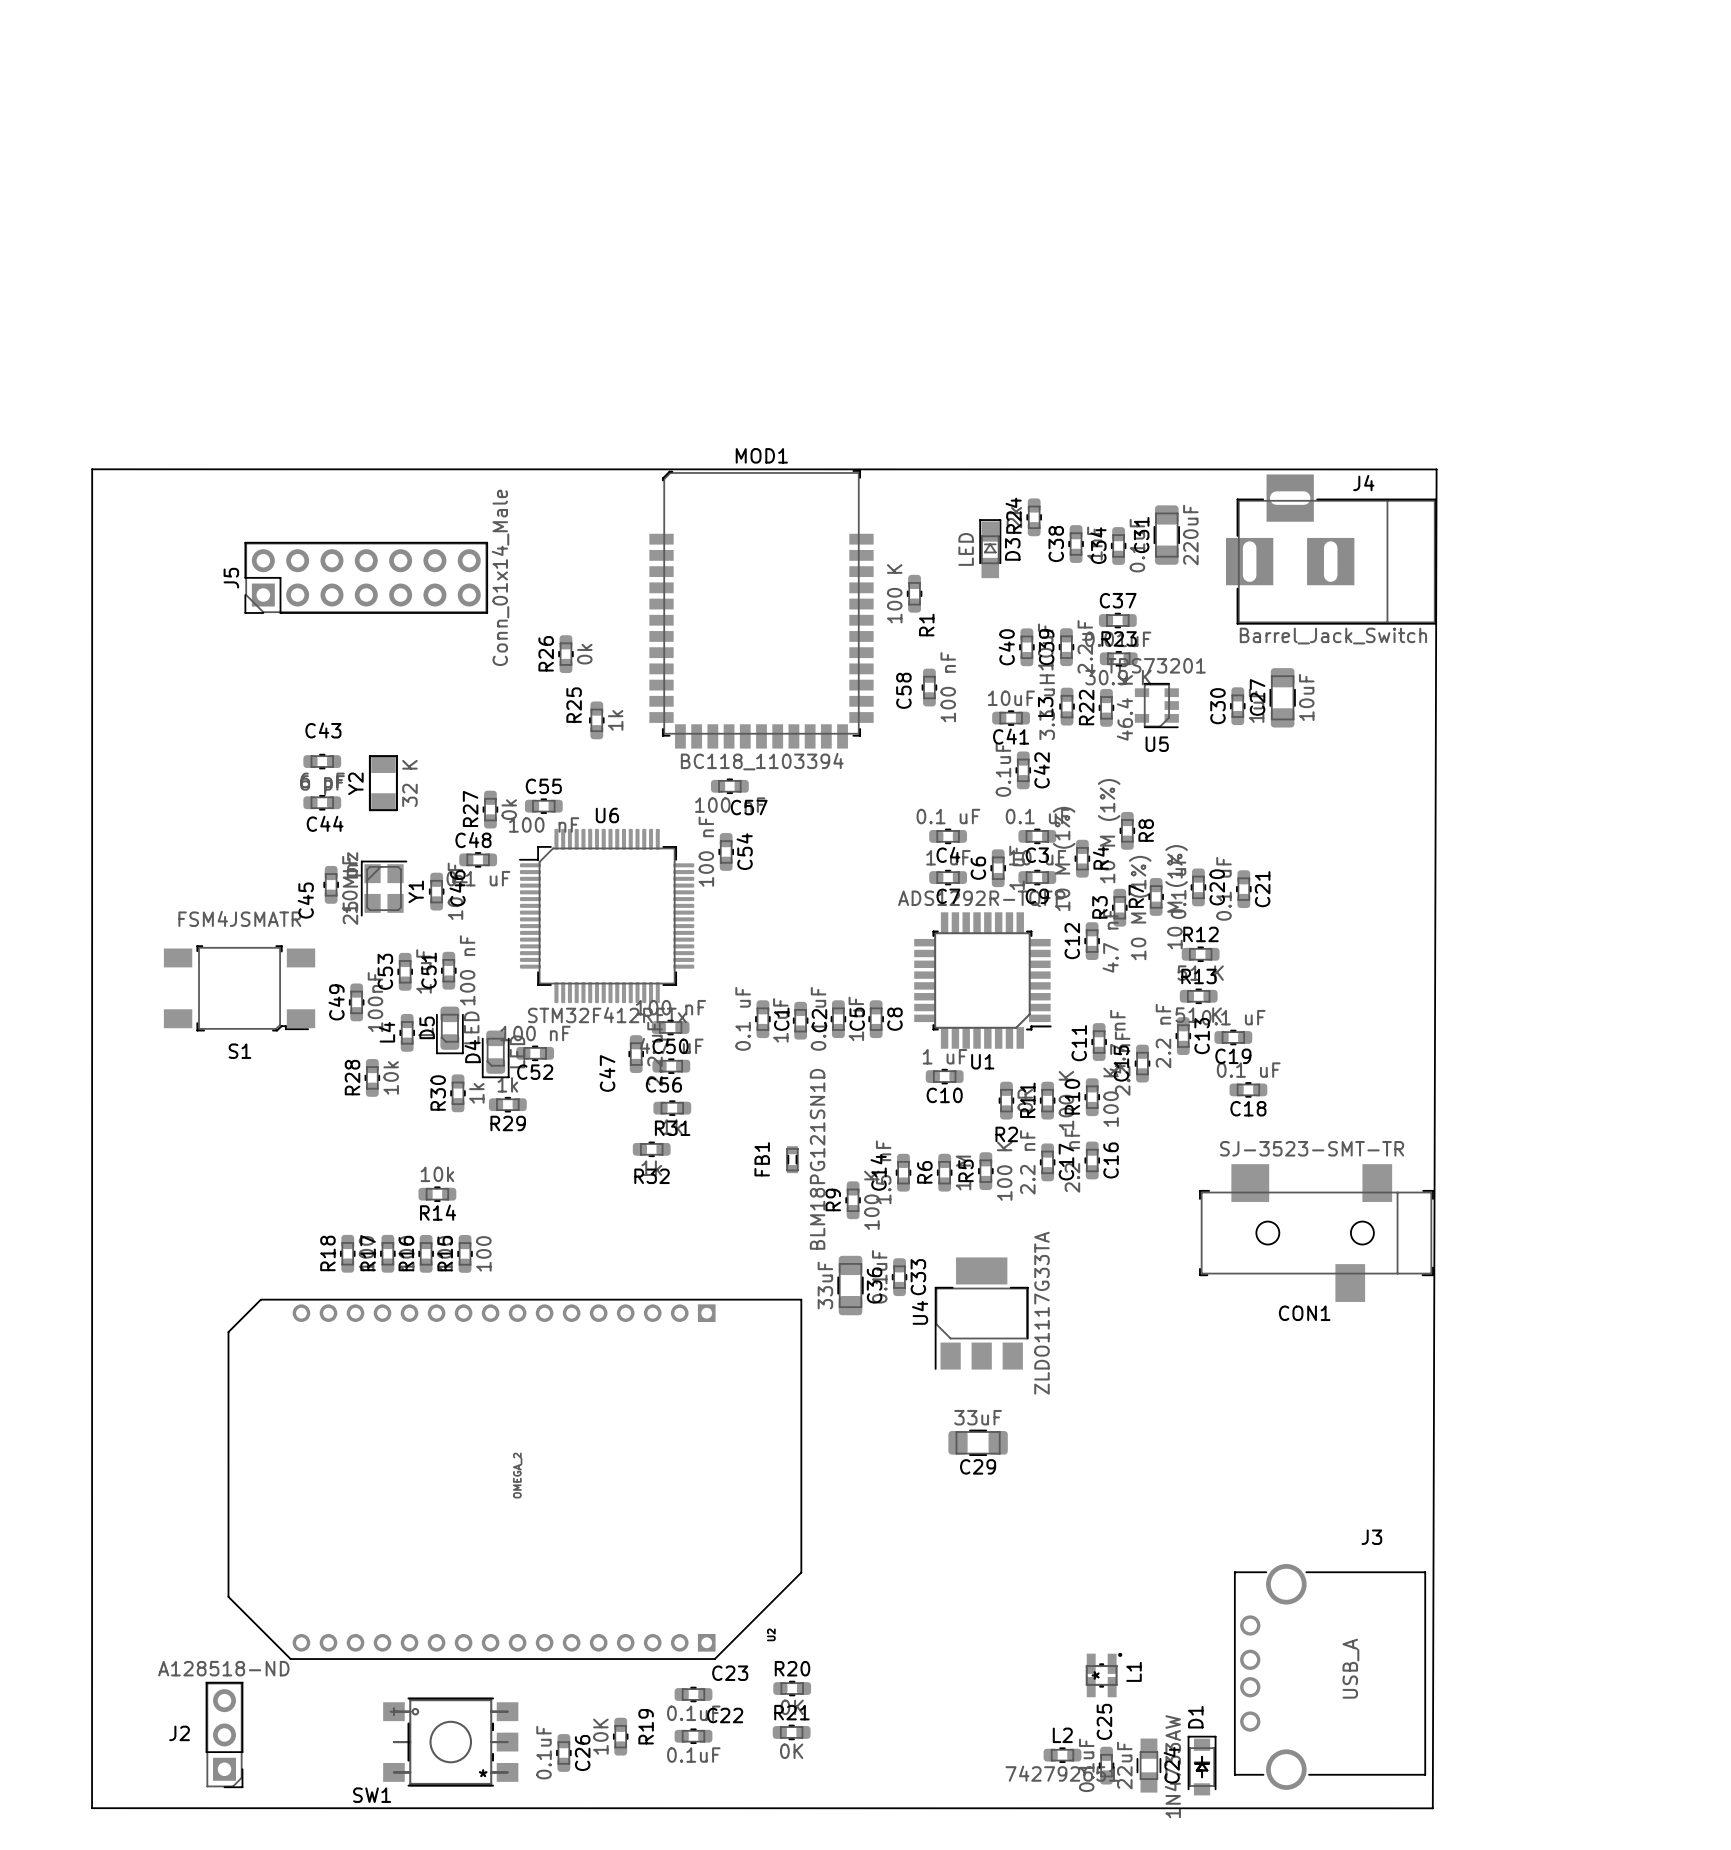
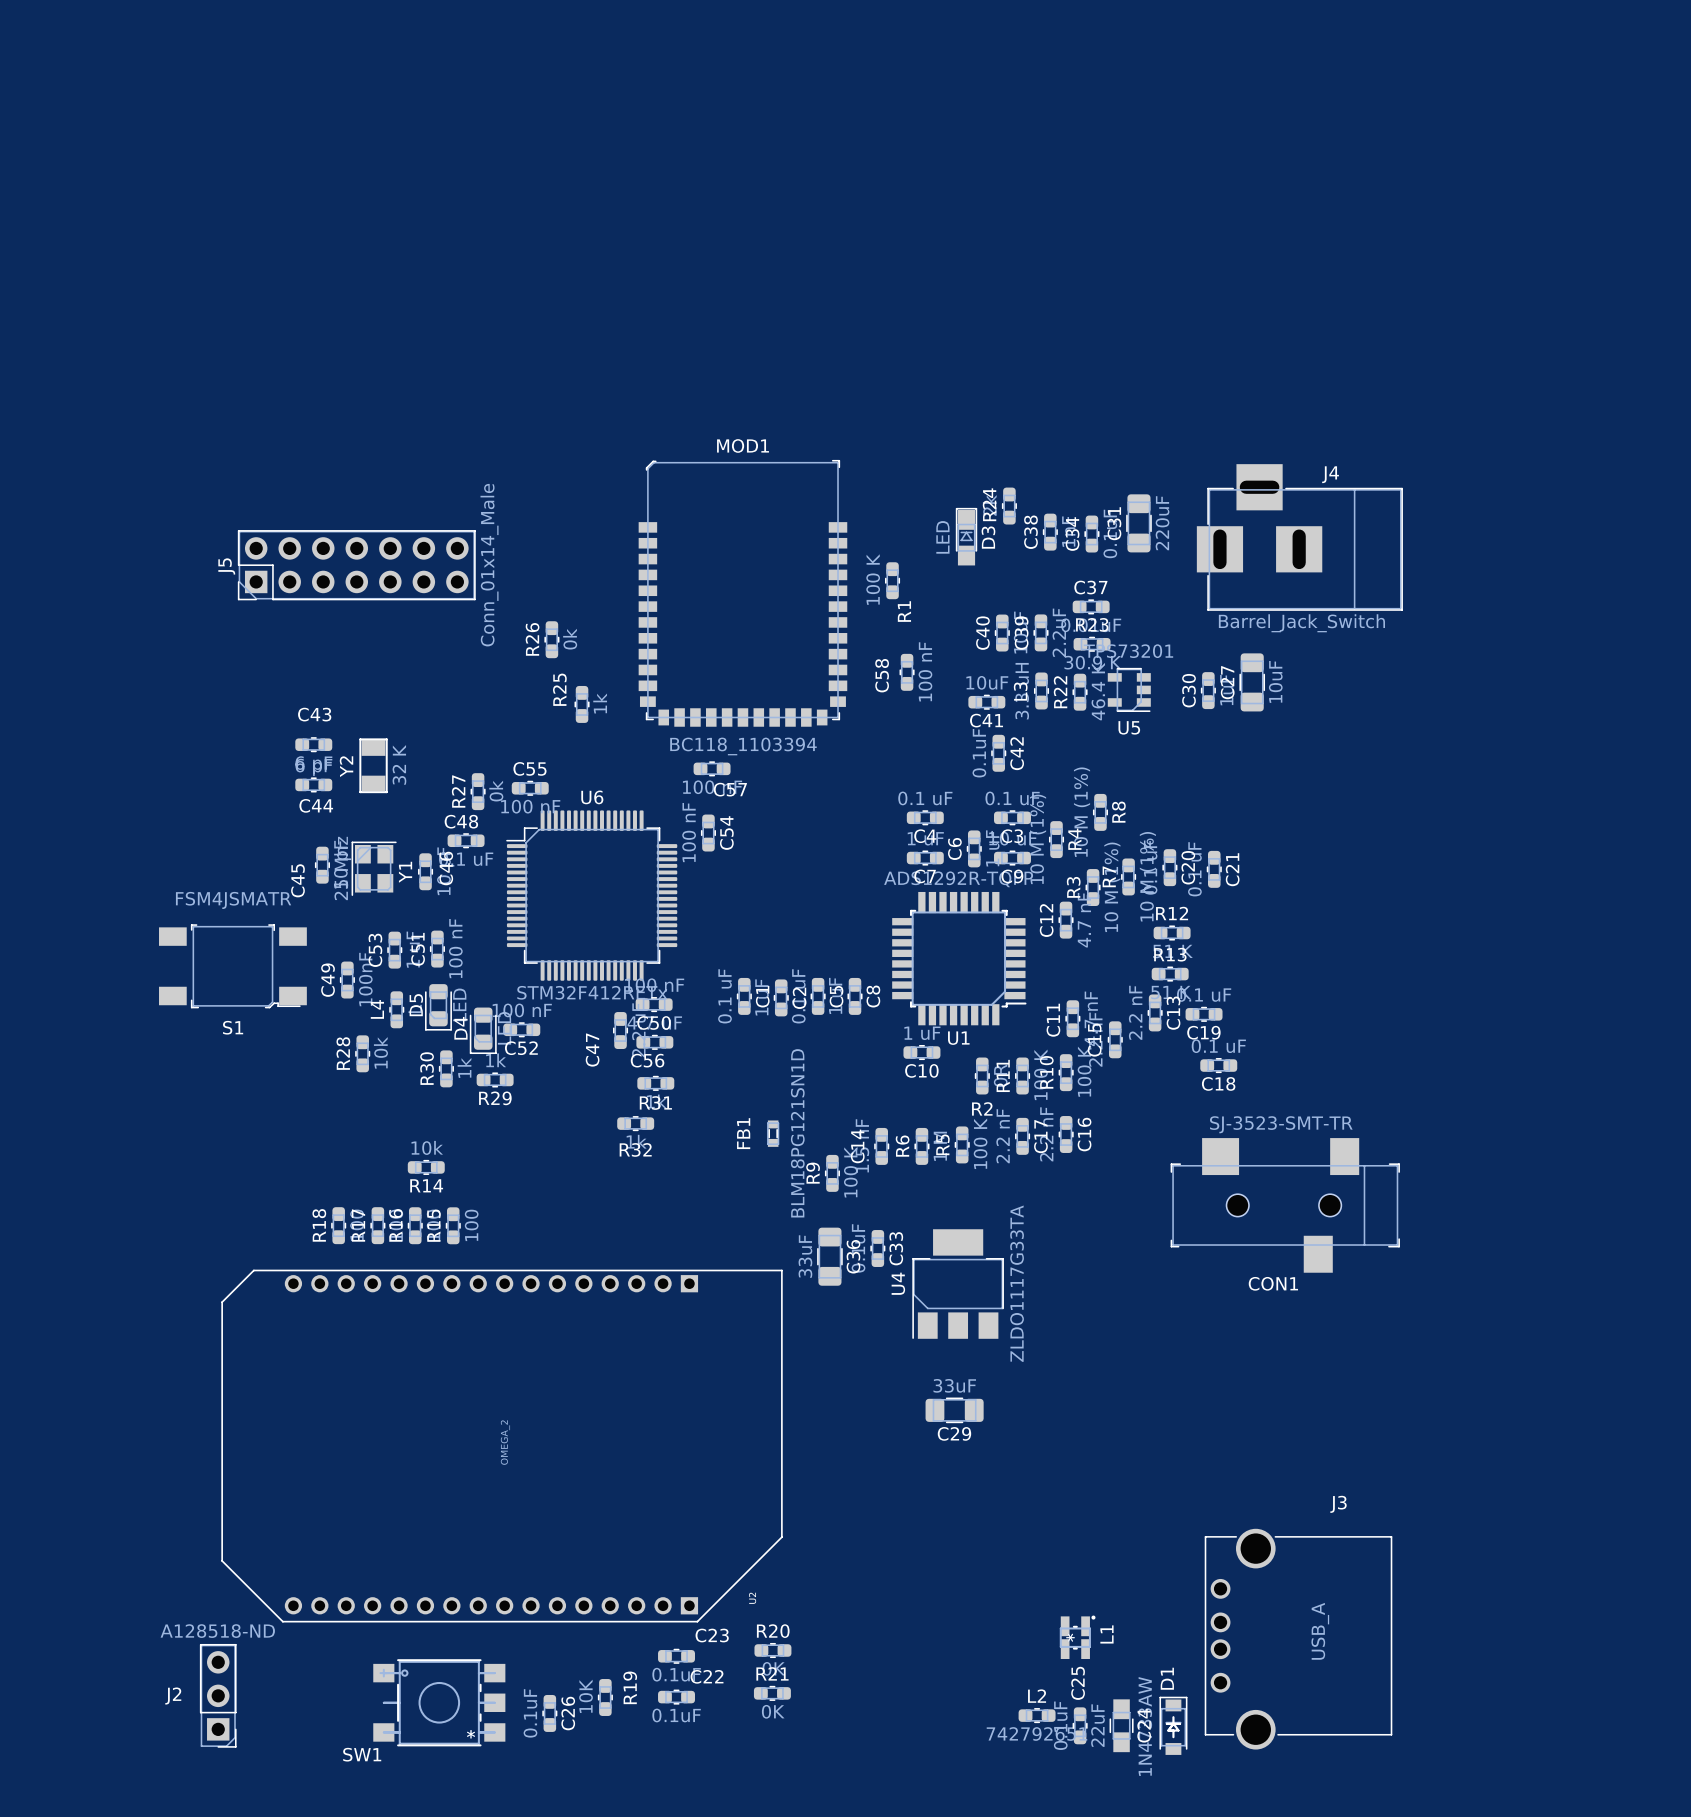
board edge: (92, 469) (1436, 469) (1432, 1808) (92, 1808) (92, 469) -> none
MOD1 footprint: [649, 470, 874, 749] -> [638, 460, 848, 727]

